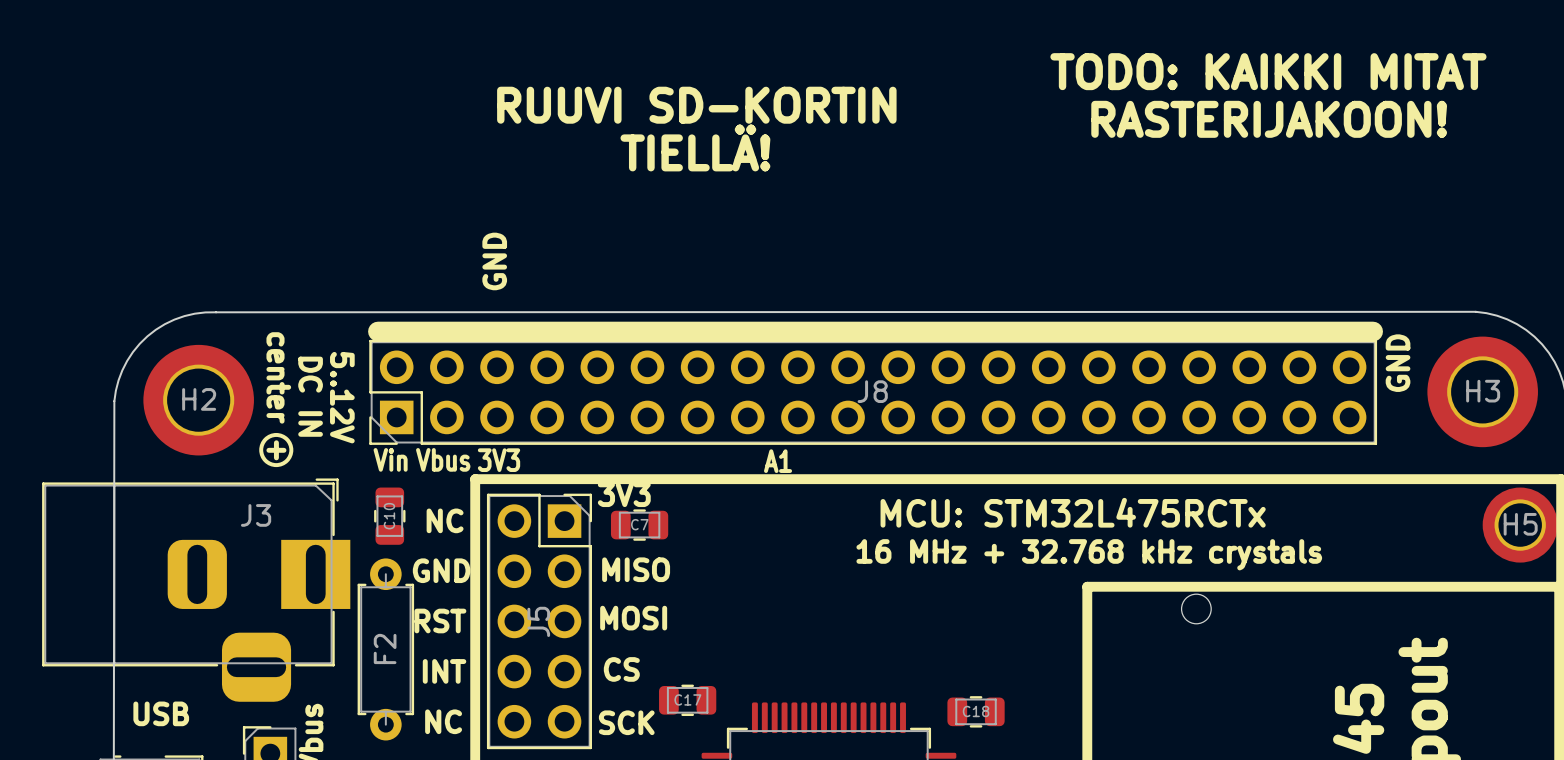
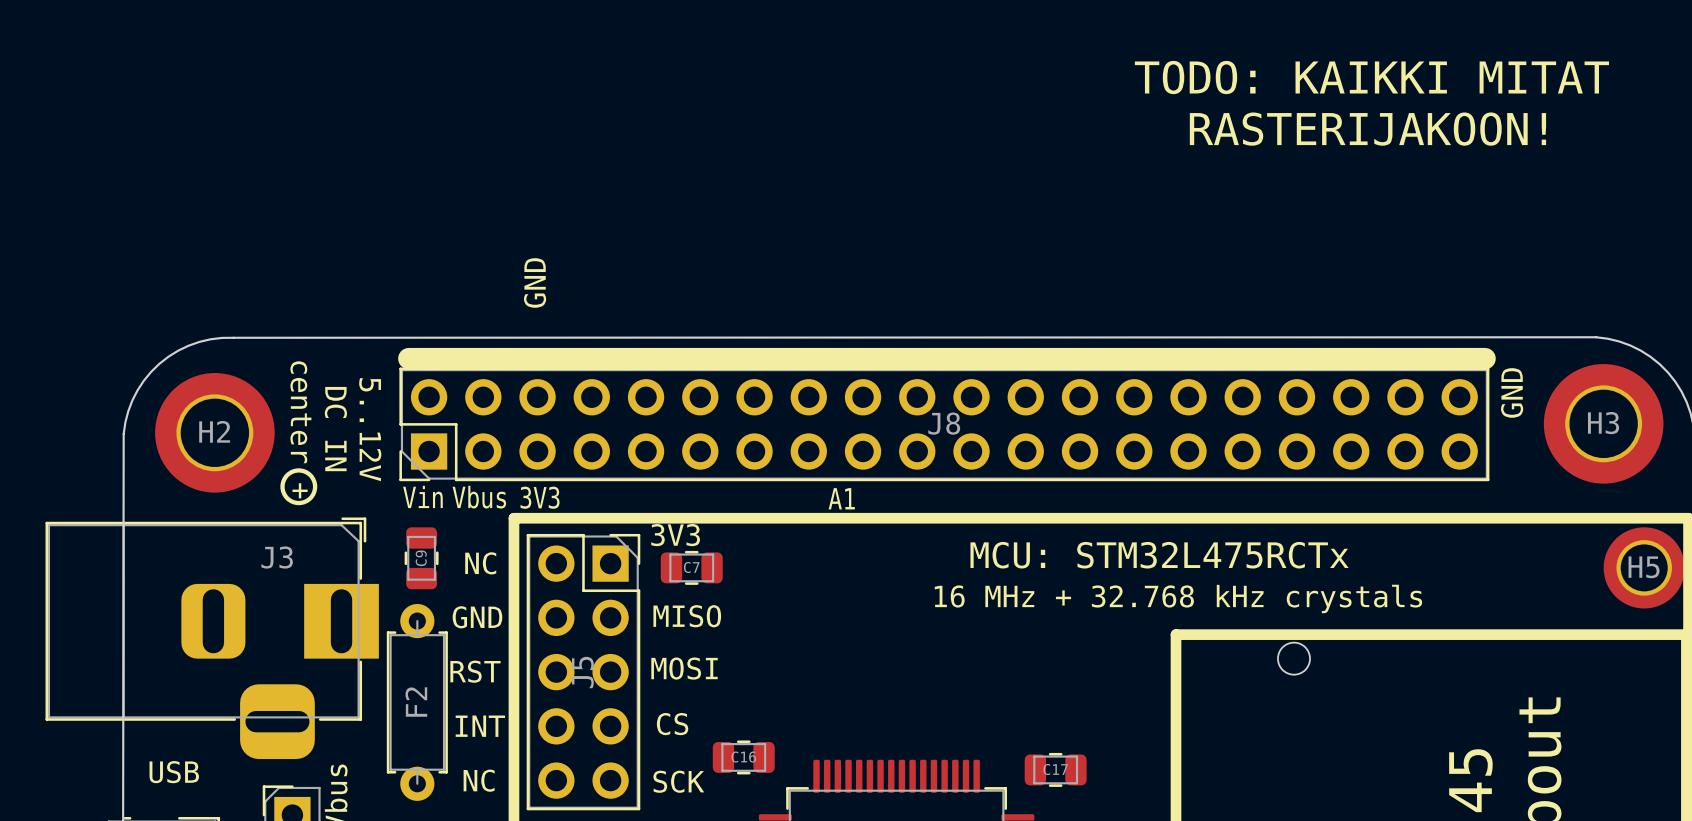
text: RUUVI SD-KORTIN (696, 105) -> none
text: TIELLÄ! (695, 147) -> none
C10 name: C10 (389, 516) -> C9 (421, 558)
C17 name: C17 (687, 699) -> C16 (743, 757)
C18 name: C18 (976, 711) -> C17 (1055, 769)

